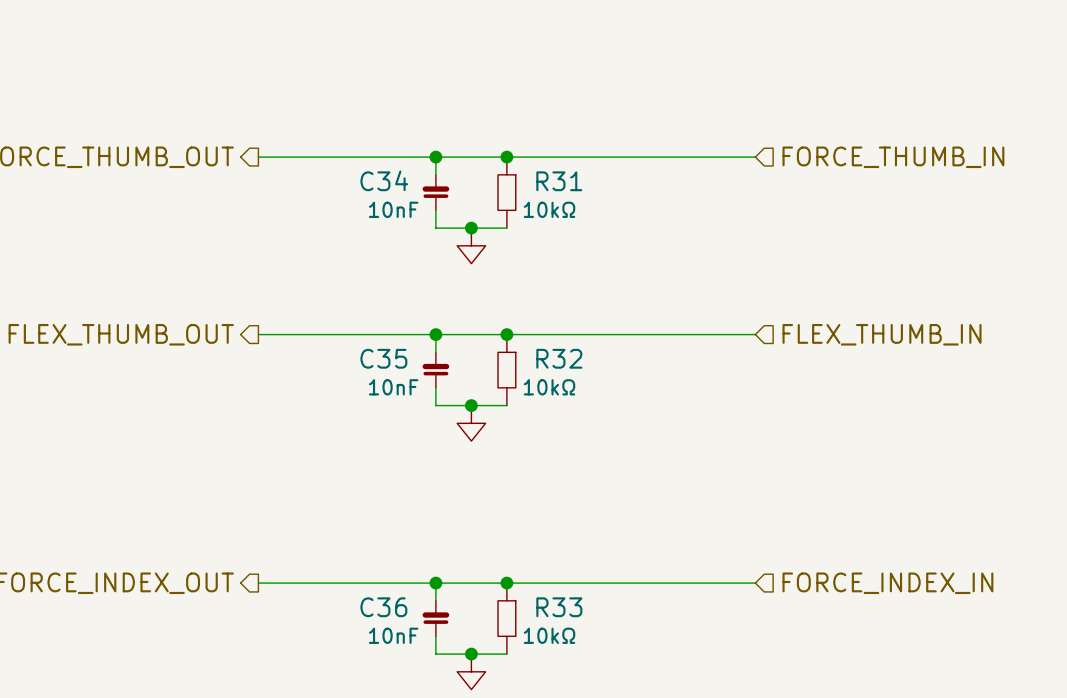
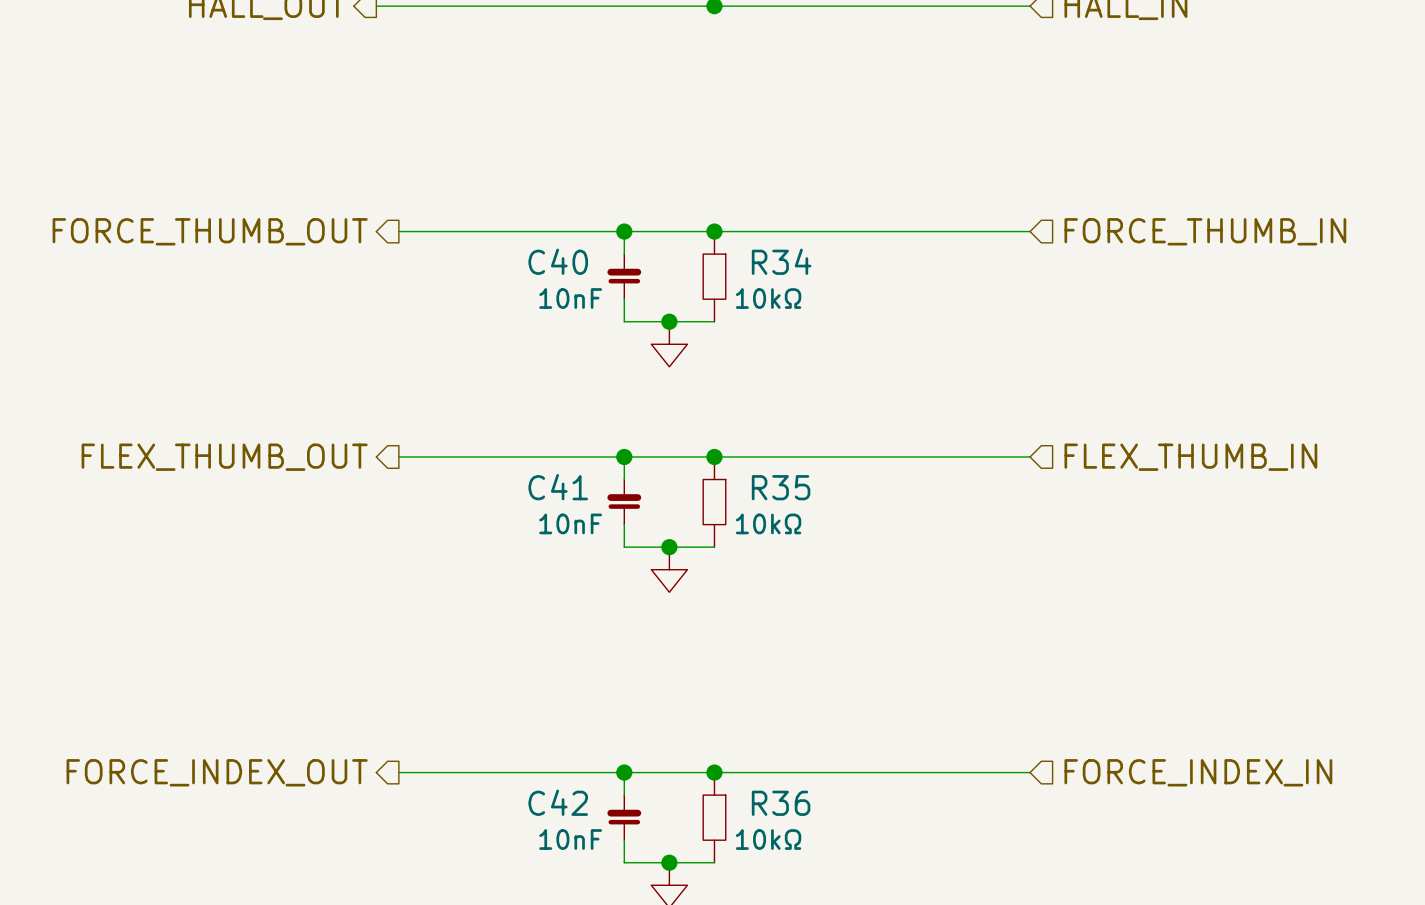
C34 name: C34 (384, 180) -> C40 (558, 261)
R31 name: R31 (559, 181) -> R34 (781, 261)
C35 name: C35 (383, 358) -> C41 (558, 487)
R32 name: R32 (559, 358) -> R35 (781, 487)
C36 name: C36 (383, 607) -> C42 (558, 802)
R33 name: R33 (559, 607) -> R36 (781, 803)

